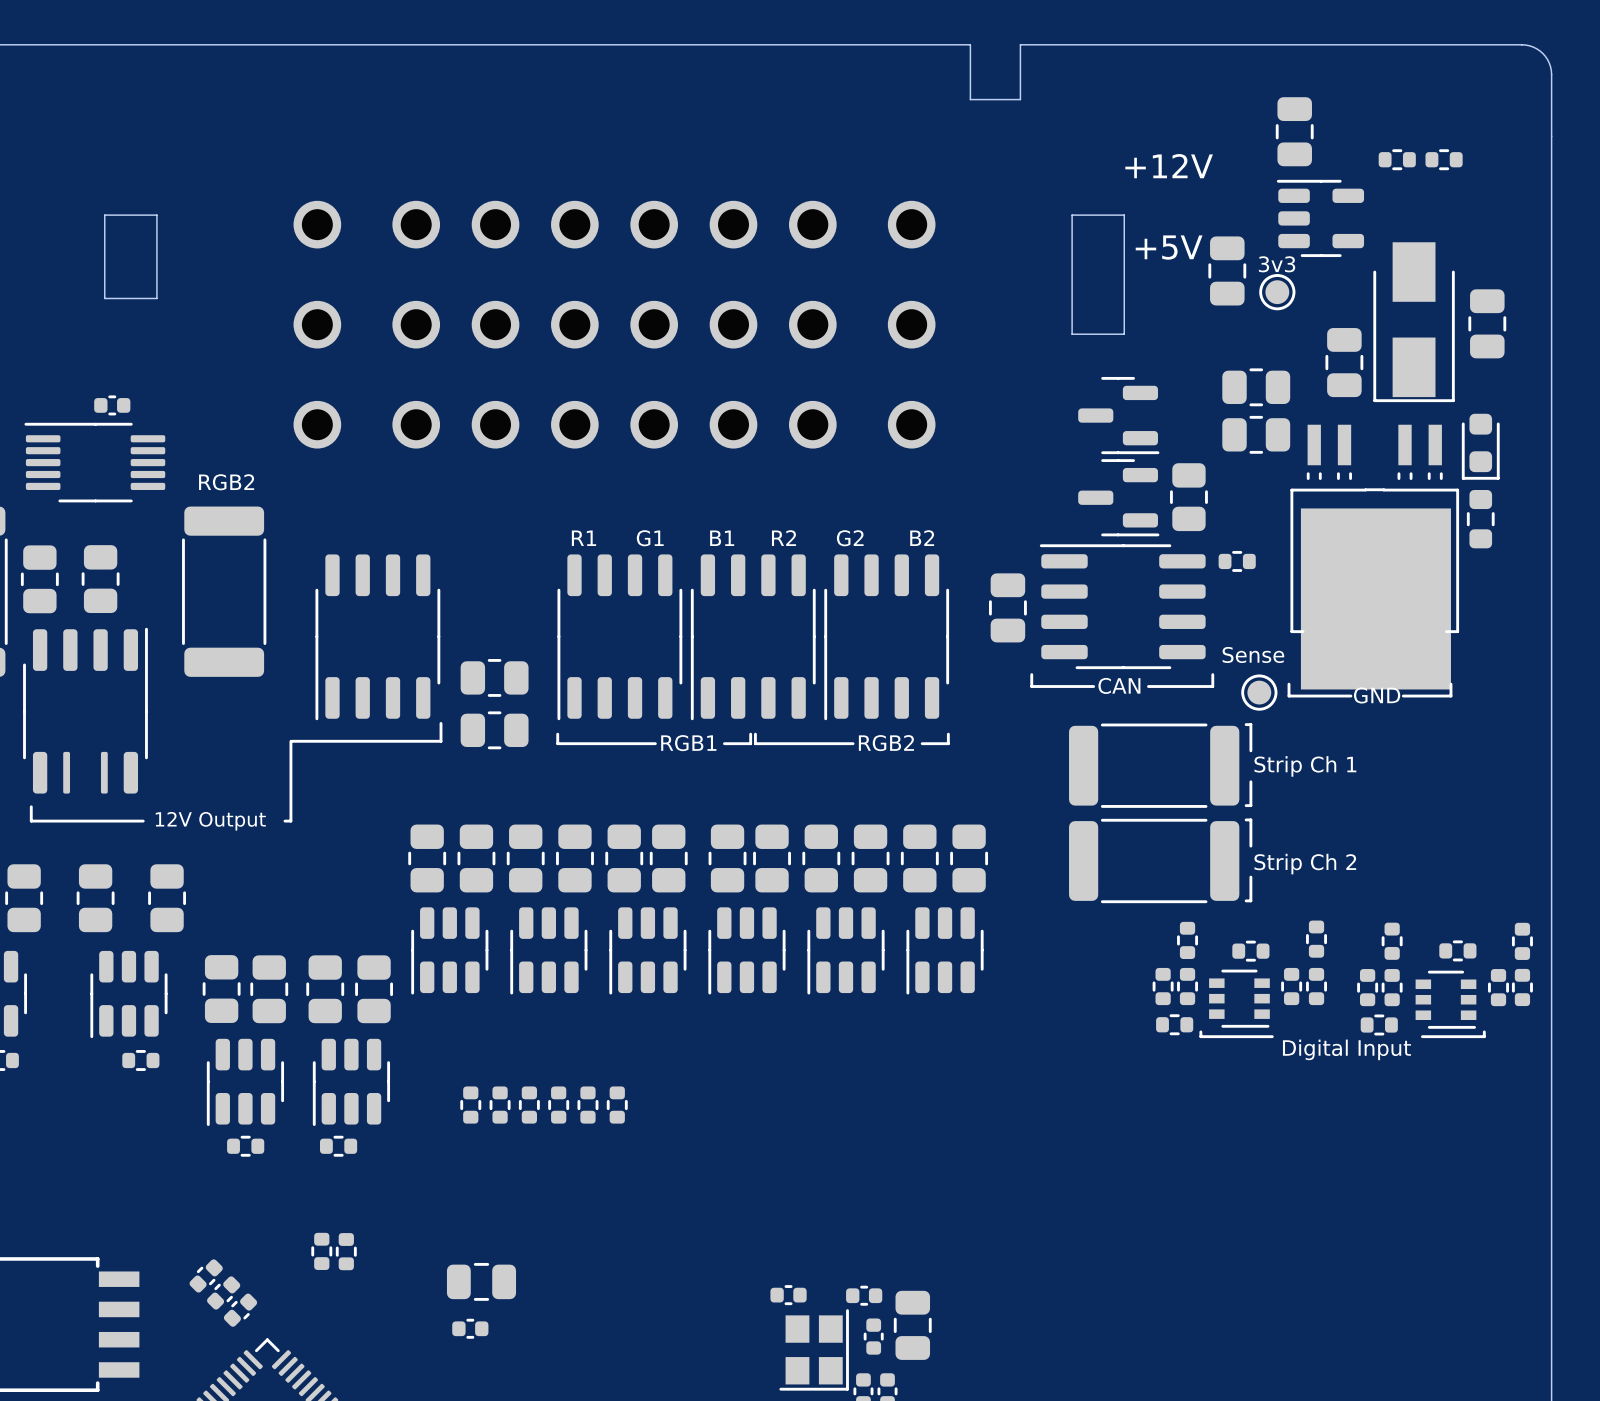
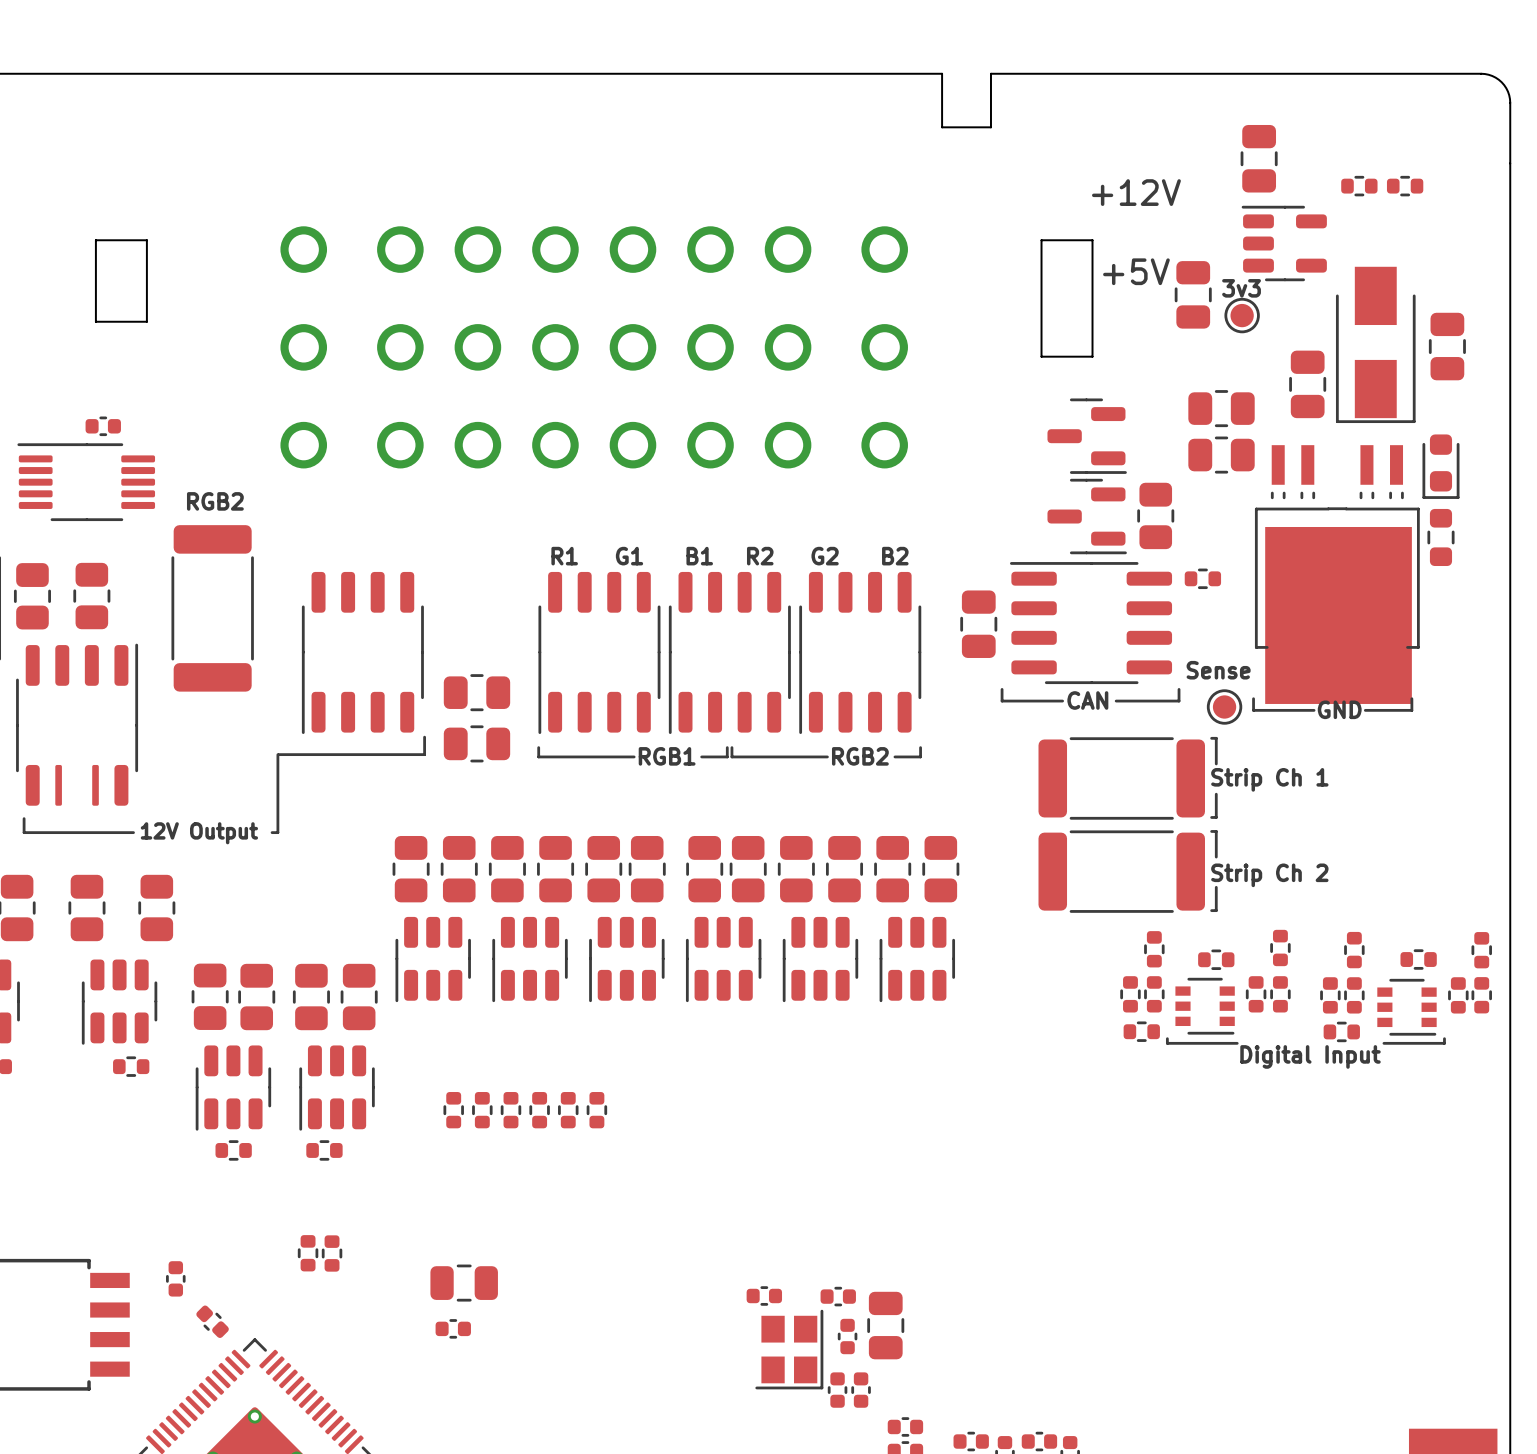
part rotation: 0° (206, 1275) -> 45° counterclockwise (175, 1278)
part: (223, 1292) -> none
part: (240, 1310) -> none
part: none -> (212, 1321)

